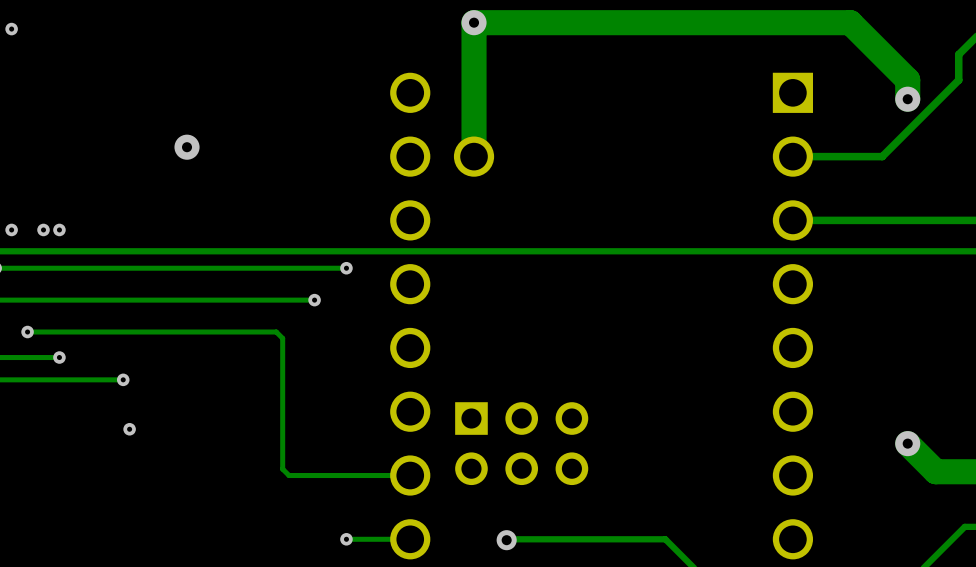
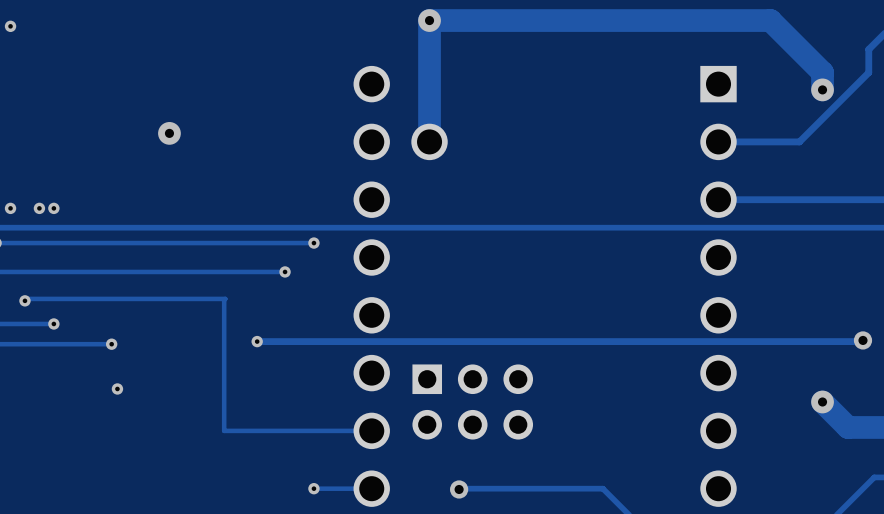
track: (27, 332) (276, 332) (282, 338) (282, 469) (289, 475) -> (24, 300) (26, 298) (225, 298) (224, 430) (261, 430)
track: none -> (862, 340) (257, 341)
via: none -> (862, 340)
via: none -> (257, 341)

